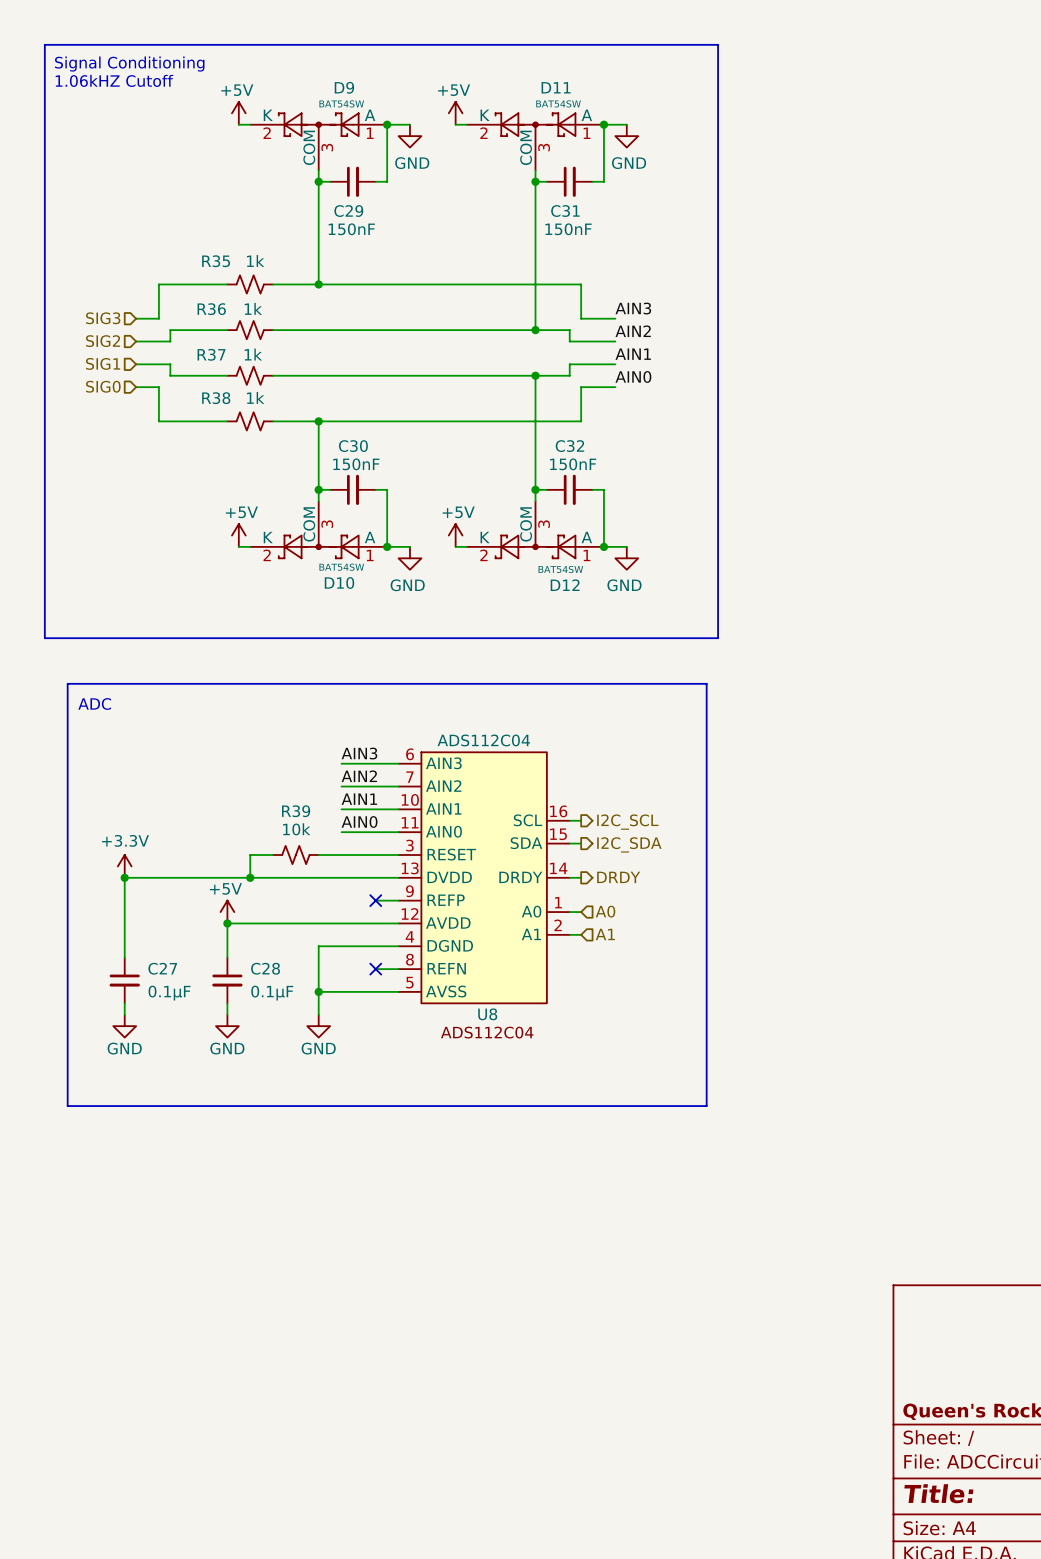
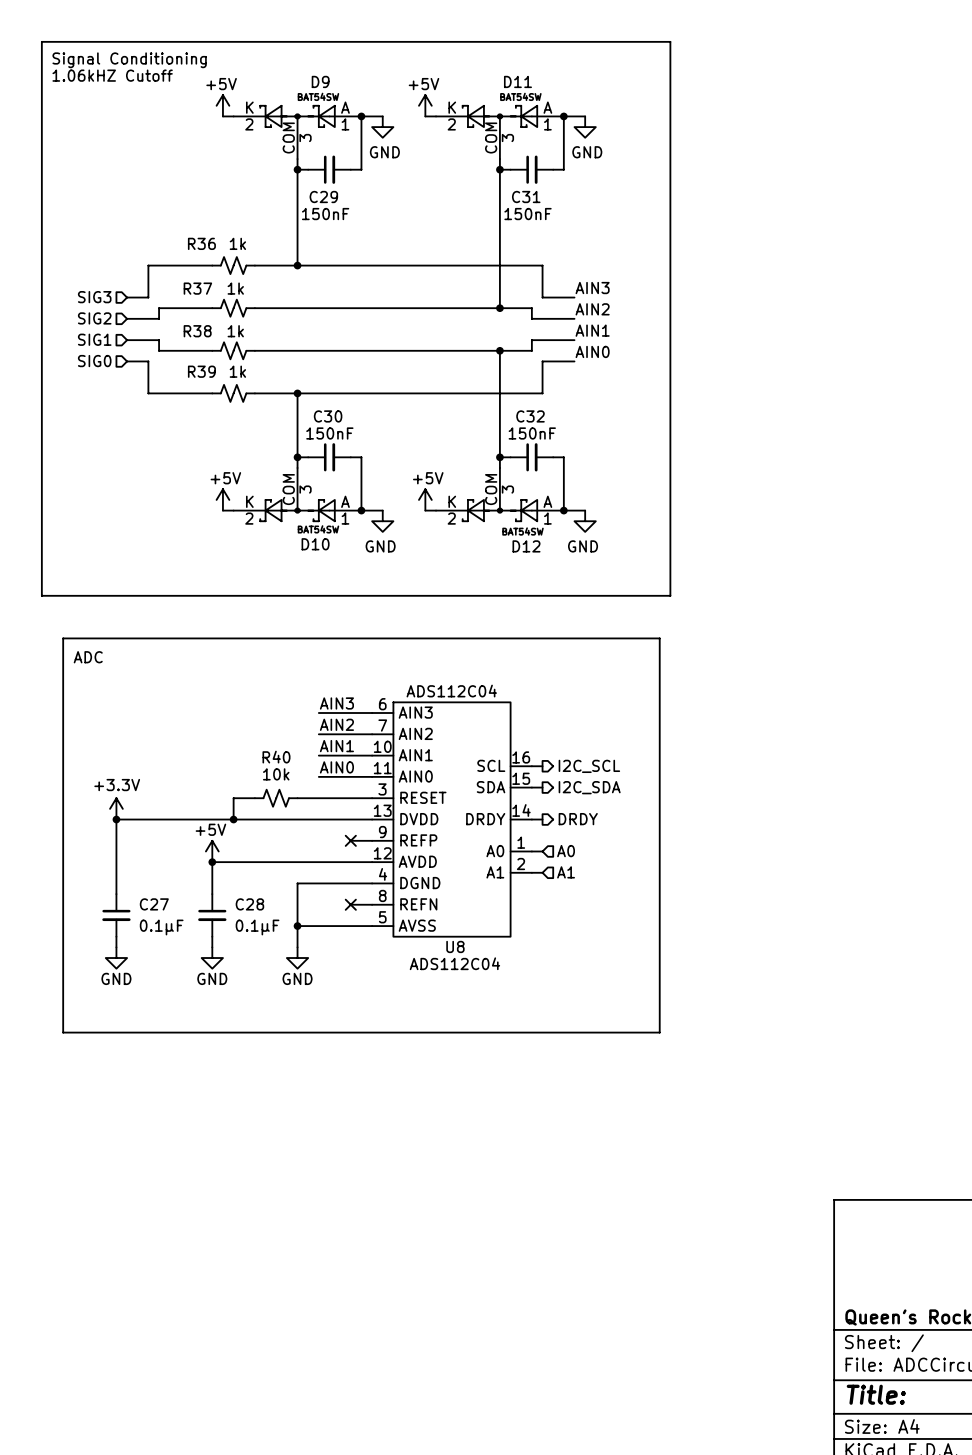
R35 name: R35 (216, 261) -> R36 (201, 243)
R36 name: R36 (211, 309) -> R37 (197, 288)
R37 name: R37 (211, 354) -> R38 (197, 331)
R38 name: R38 (216, 398) -> R39 (201, 371)
R39 name: R39 (296, 811) -> R40 (276, 757)

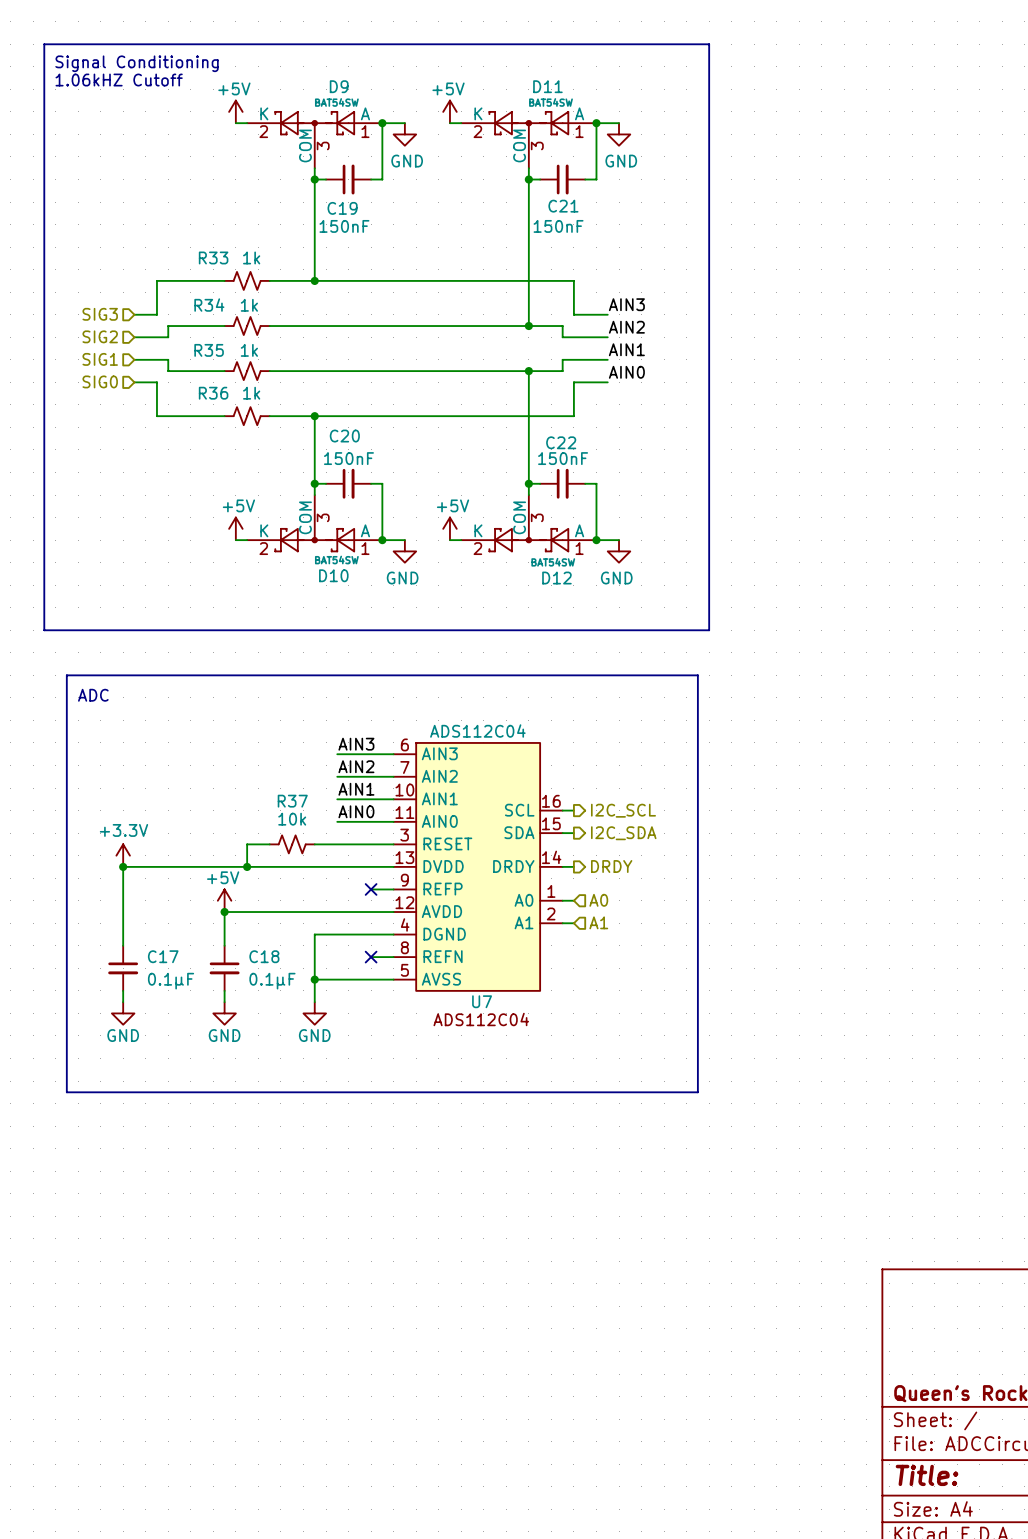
C29 name: C29 (323, 197) -> C19 (342, 208)
C31 name: C31 (526, 197) -> C21 (563, 206)
R36 name: R36 (201, 243) -> R33 (213, 257)
R37 name: R37 (197, 288) -> R34 (209, 305)
R38 name: R38 (197, 331) -> R35 (209, 350)
R39 name: R39 (201, 371) -> R36 (213, 393)
C30 name: C30 (328, 416) -> C20 (344, 436)
C32 name: C32 (530, 416) -> C22 (561, 442)
R40 name: R40 (276, 757) -> R37 (292, 801)
C27 name: C27 (154, 904) -> C17 (163, 956)
C28 name: C28 (249, 904) -> C18 (264, 956)
U8 name: U8 (455, 946) -> U7 (482, 1001)

